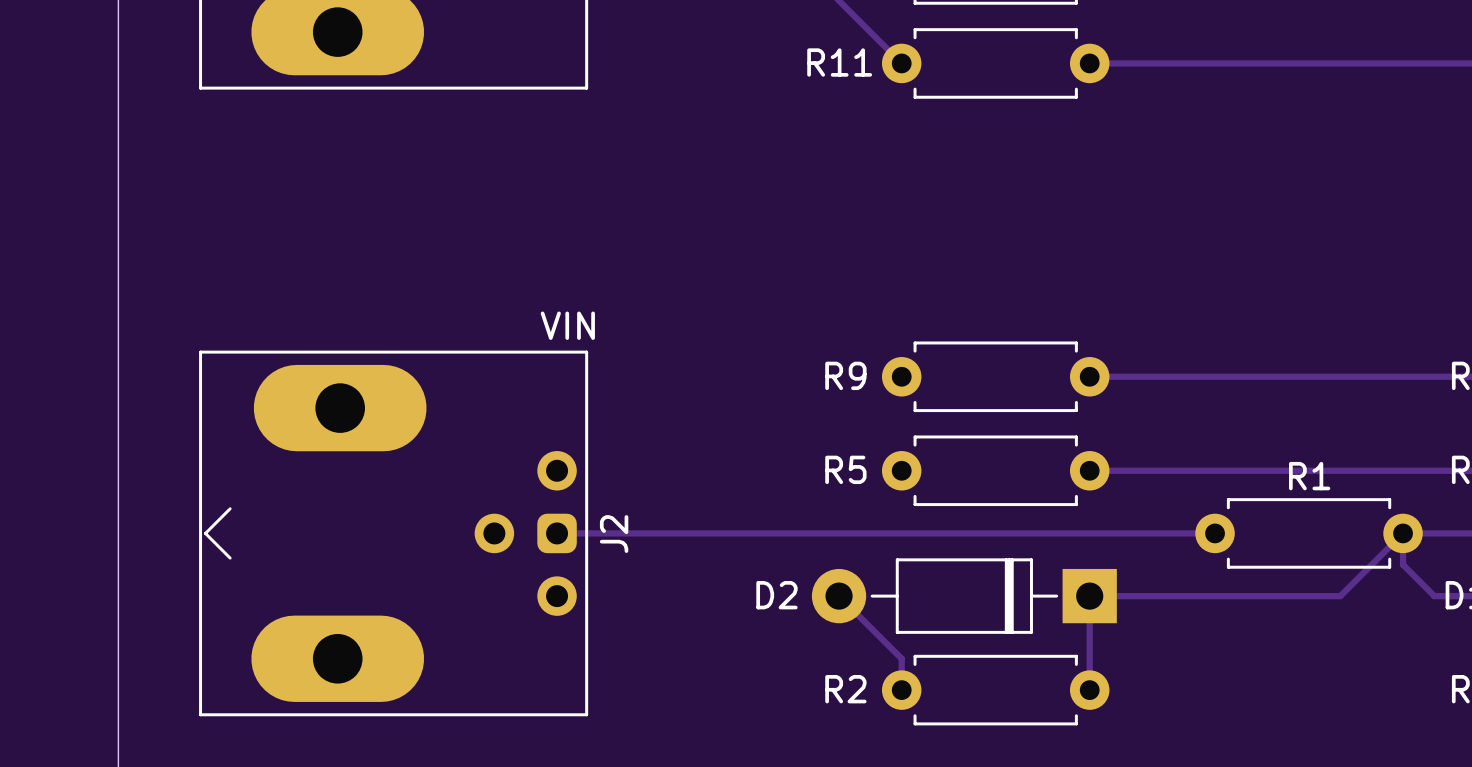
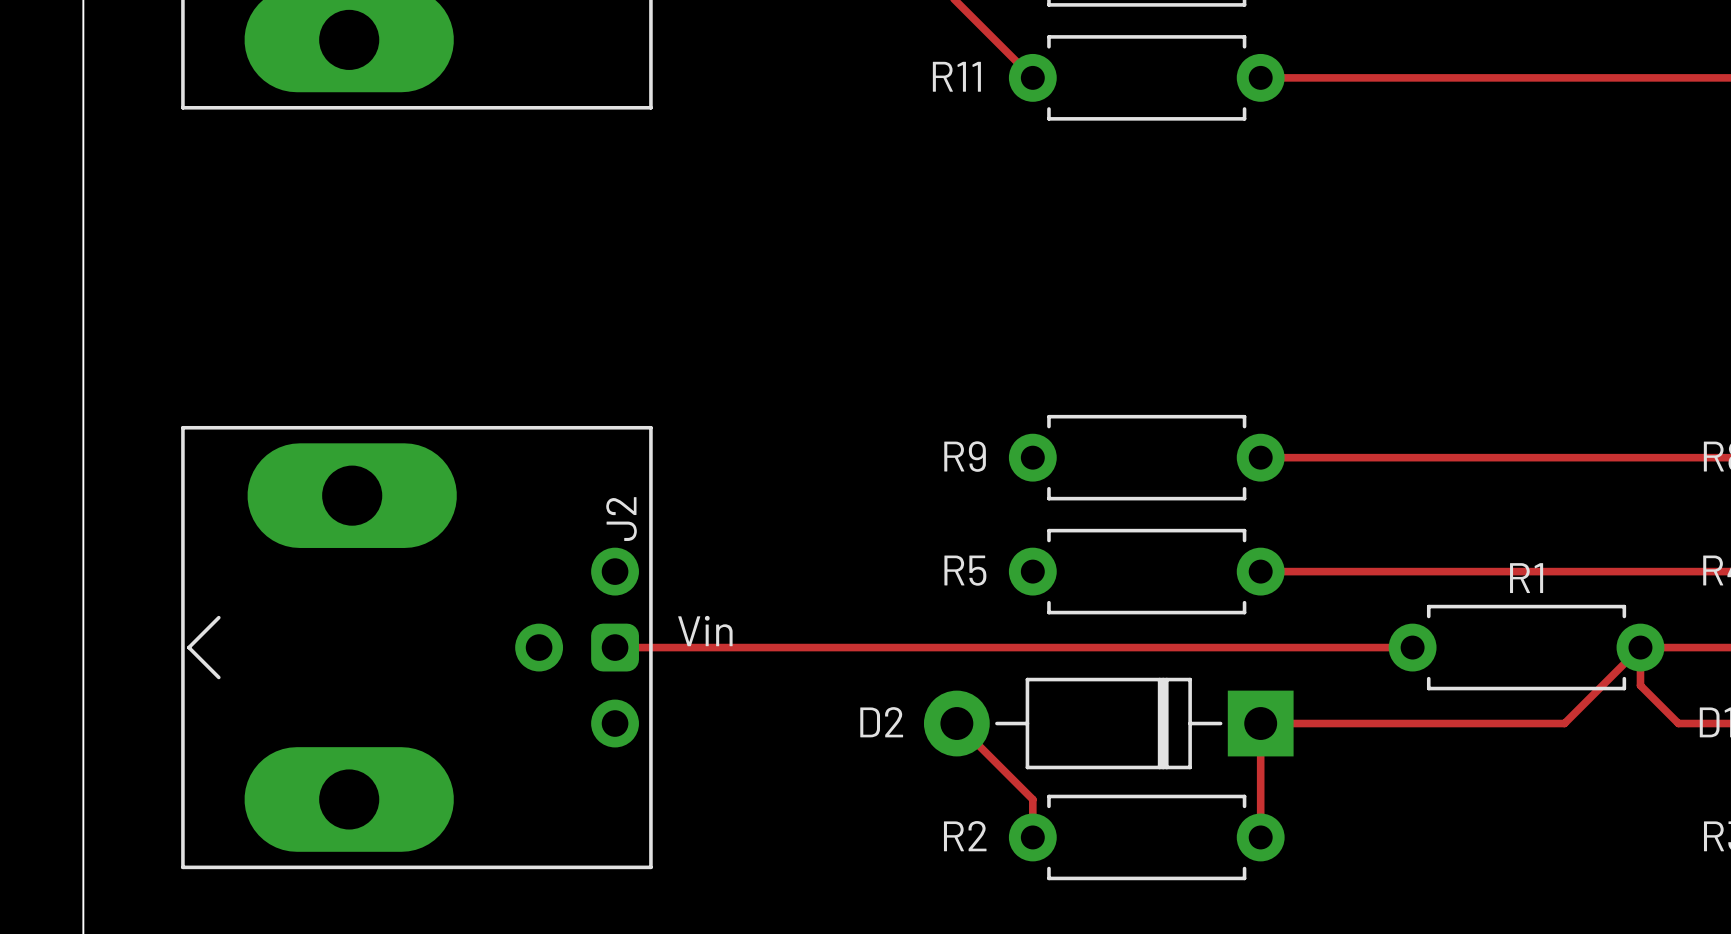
text: VIN (567, 325) -> none
text: none -> Vin (705, 631)
J2 name position: J2 (614, 534) -> J2 (621, 519)

